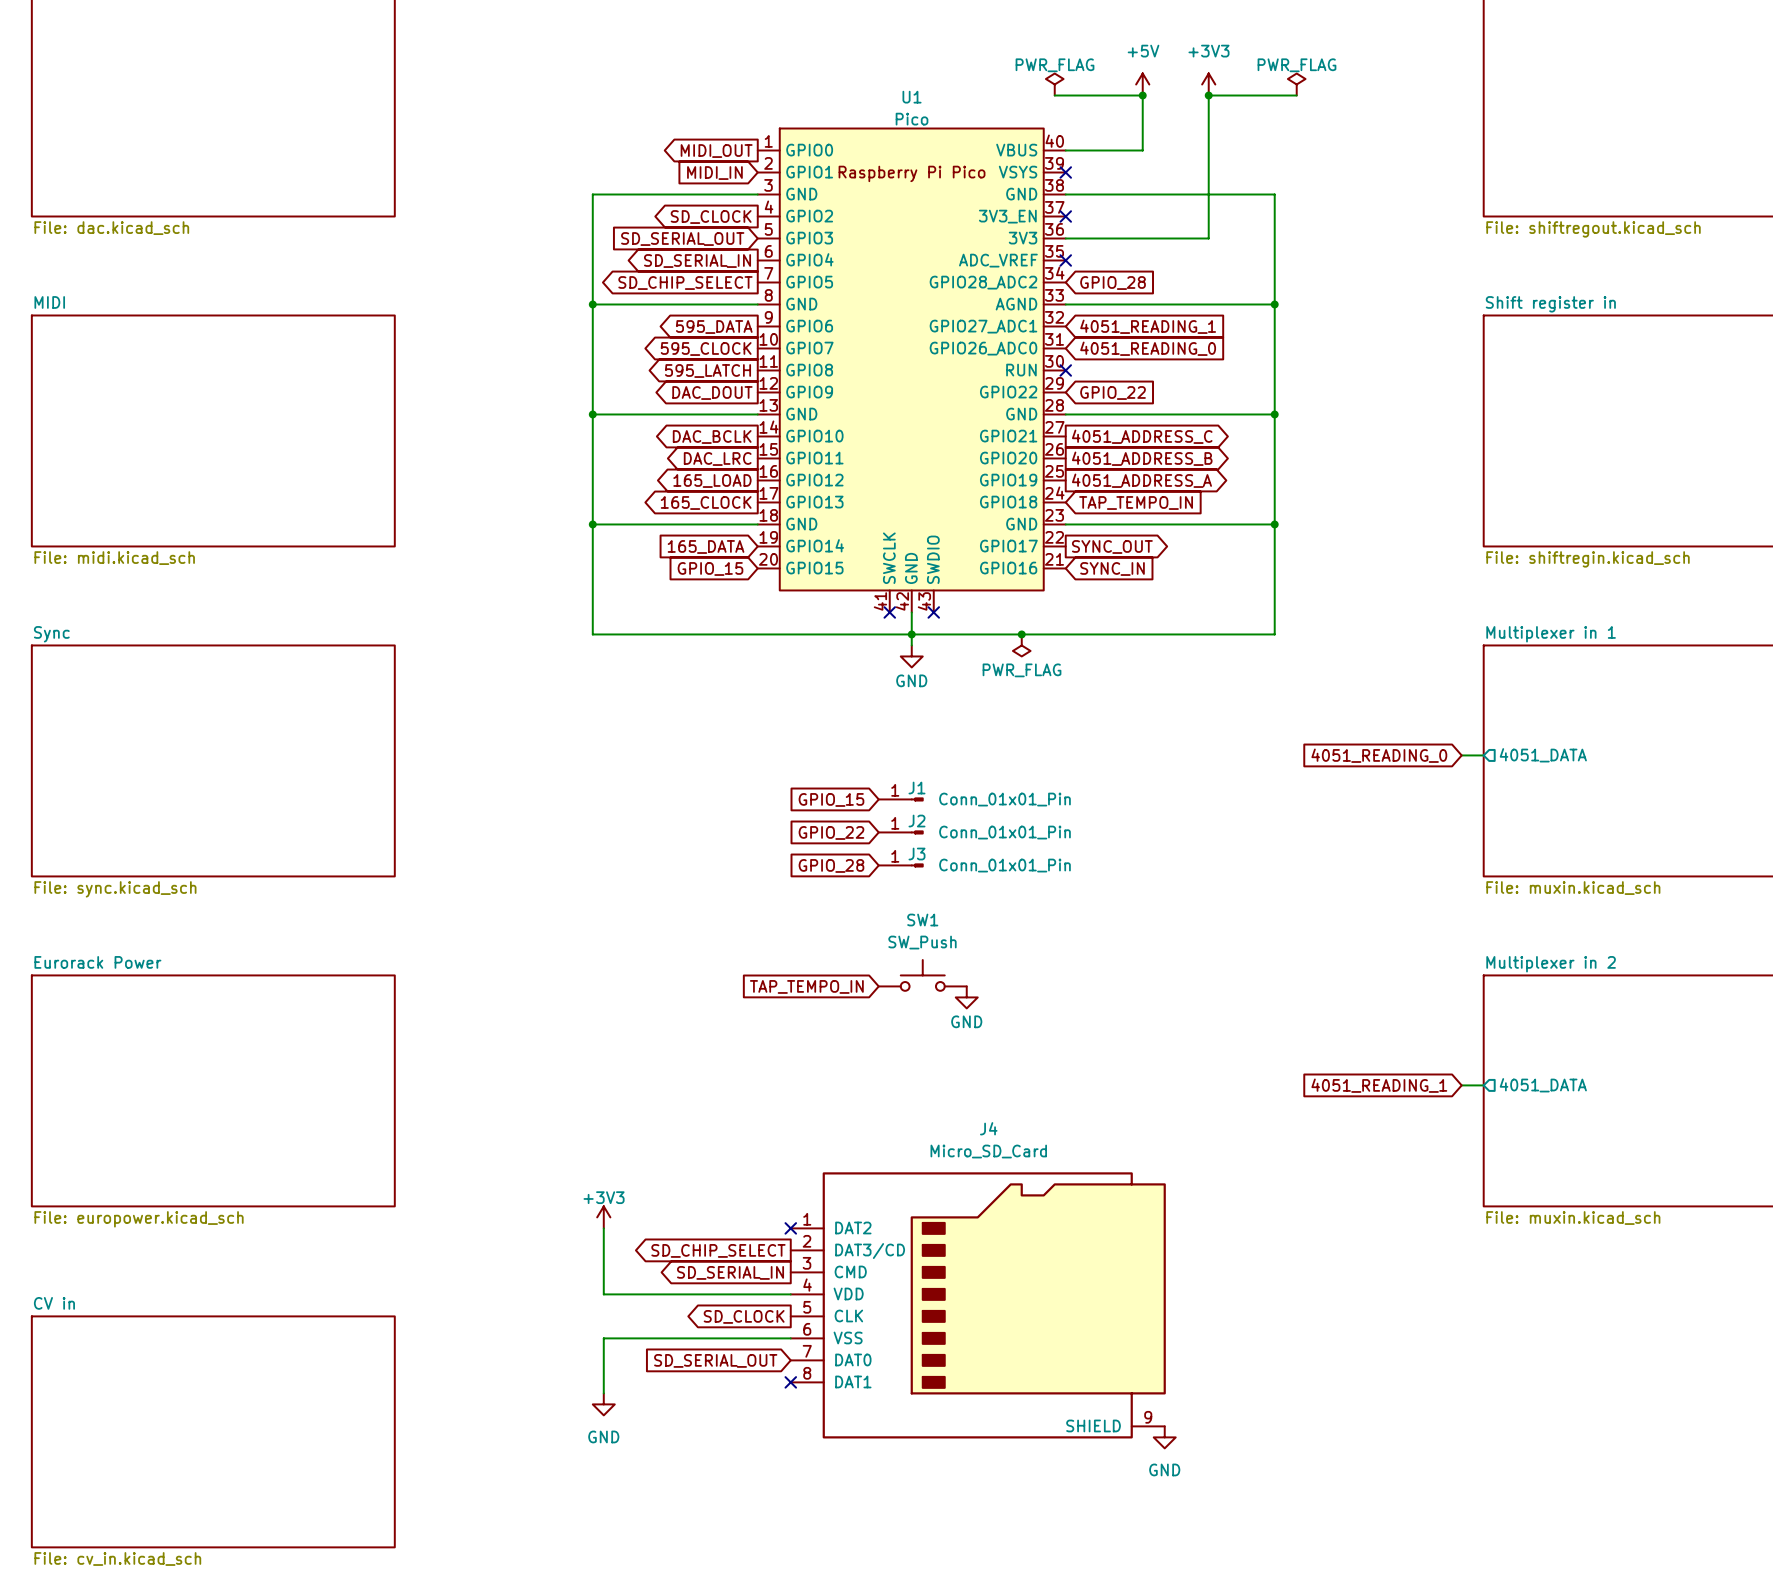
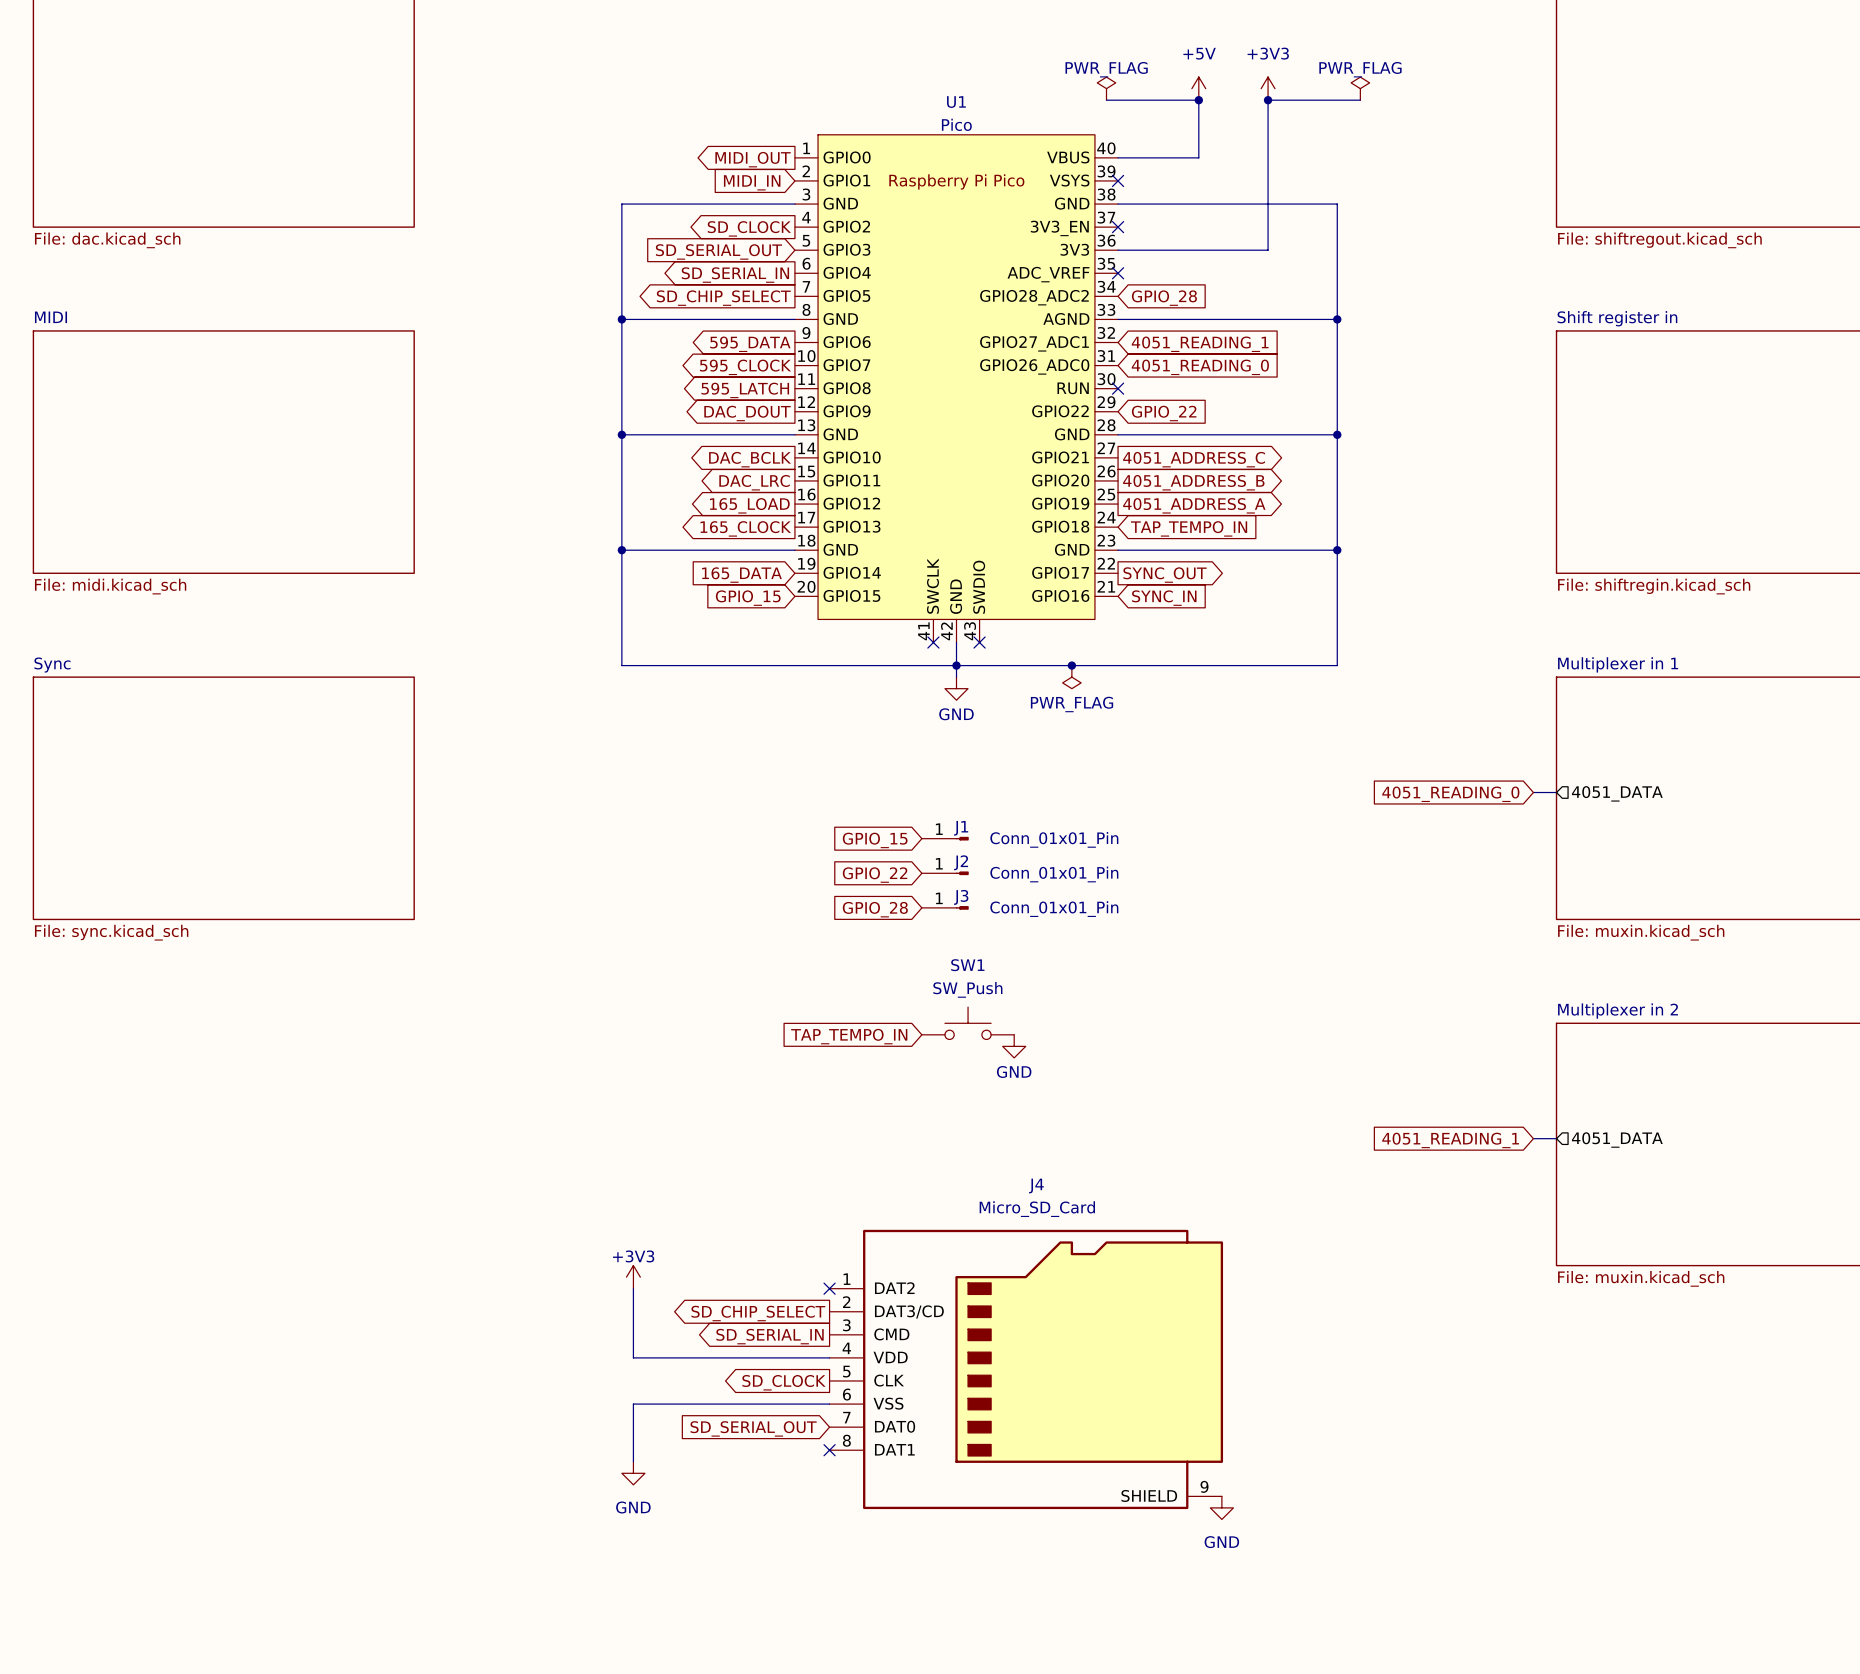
sheet Eurorack Power: File: europower.kicad_sch (213, 1090) -> none
sheet CV in: File: cv_in.kicad_sch (213, 1431) -> none

